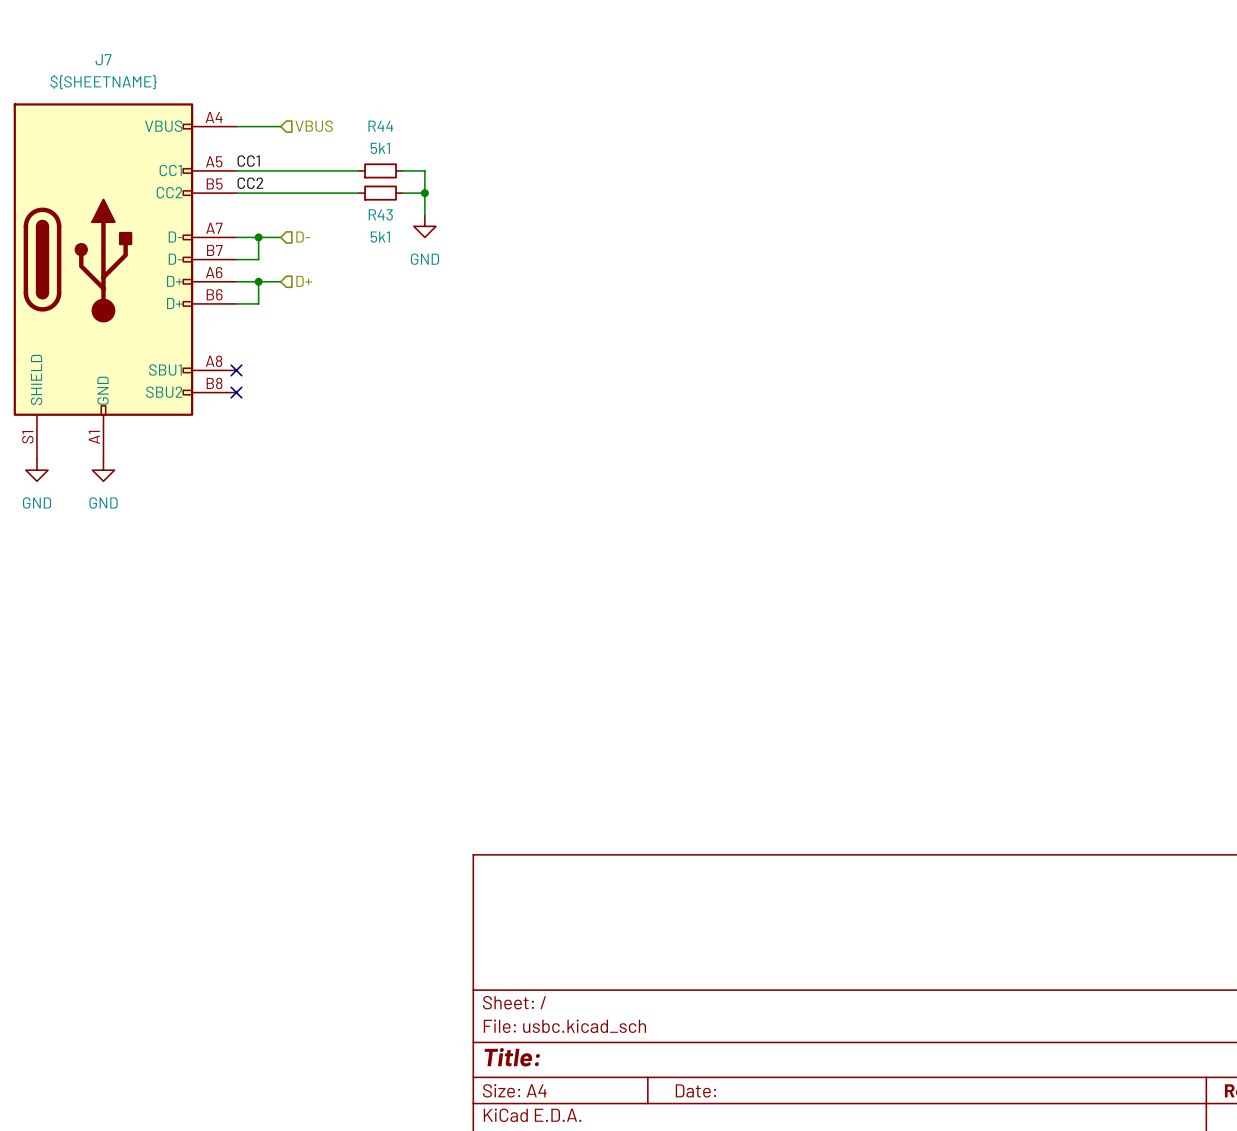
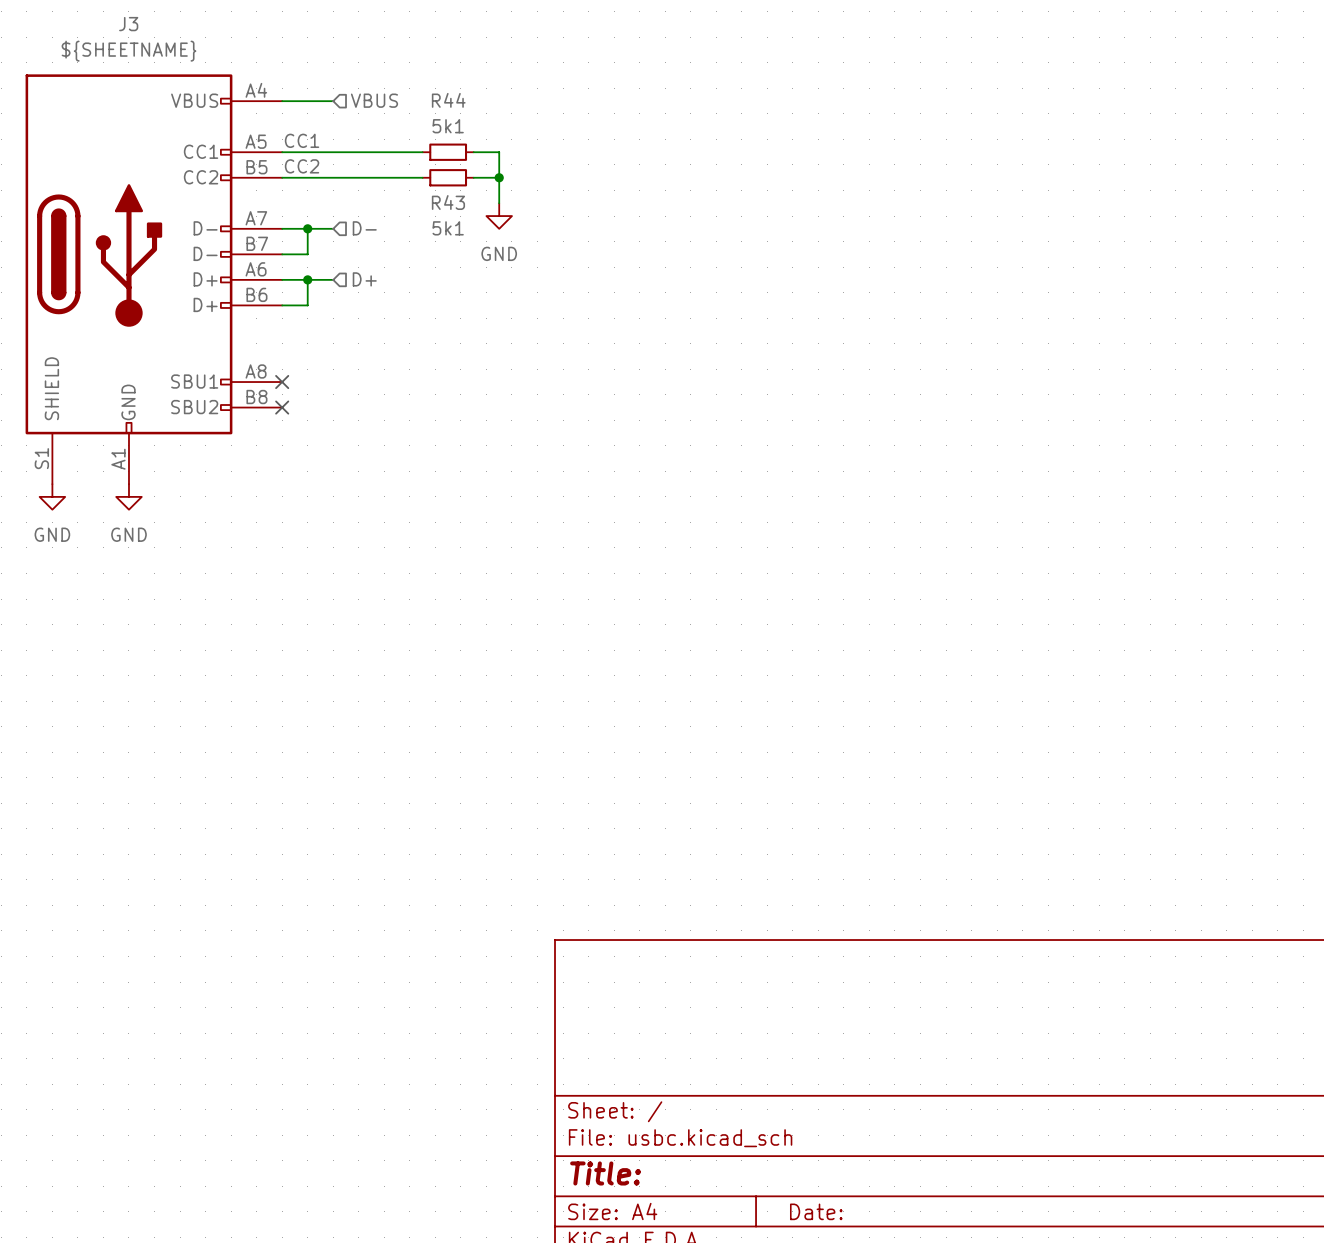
J7 name: J7 (103, 59) -> J3 (128, 24)

